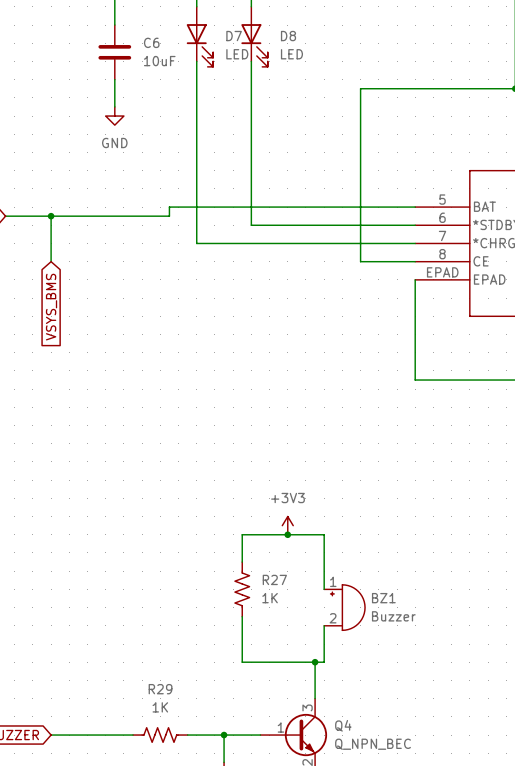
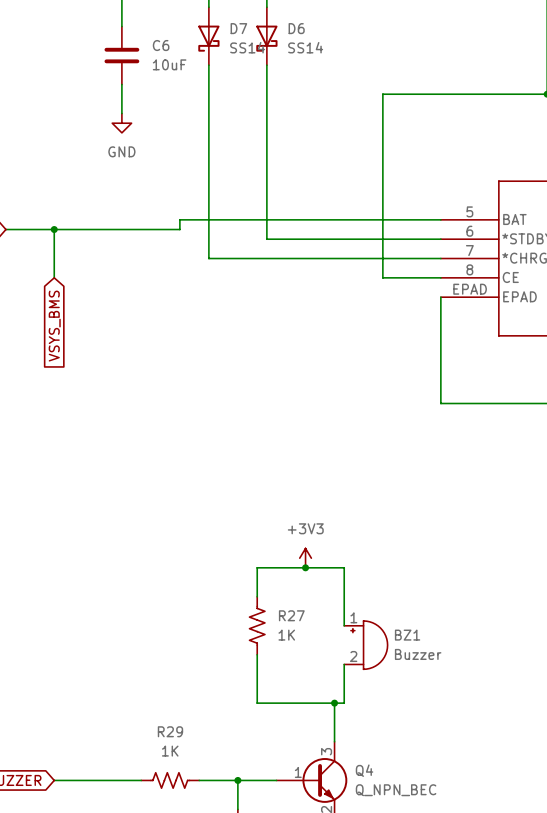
D7 symbol: [186, 6, 214, 67] -> [198, 7, 220, 66]
D6: none -> SS14 (266, 36)
D8: LED (254, 36) -> none
D7 value: LED (237, 54) -> SS14 (247, 47)

